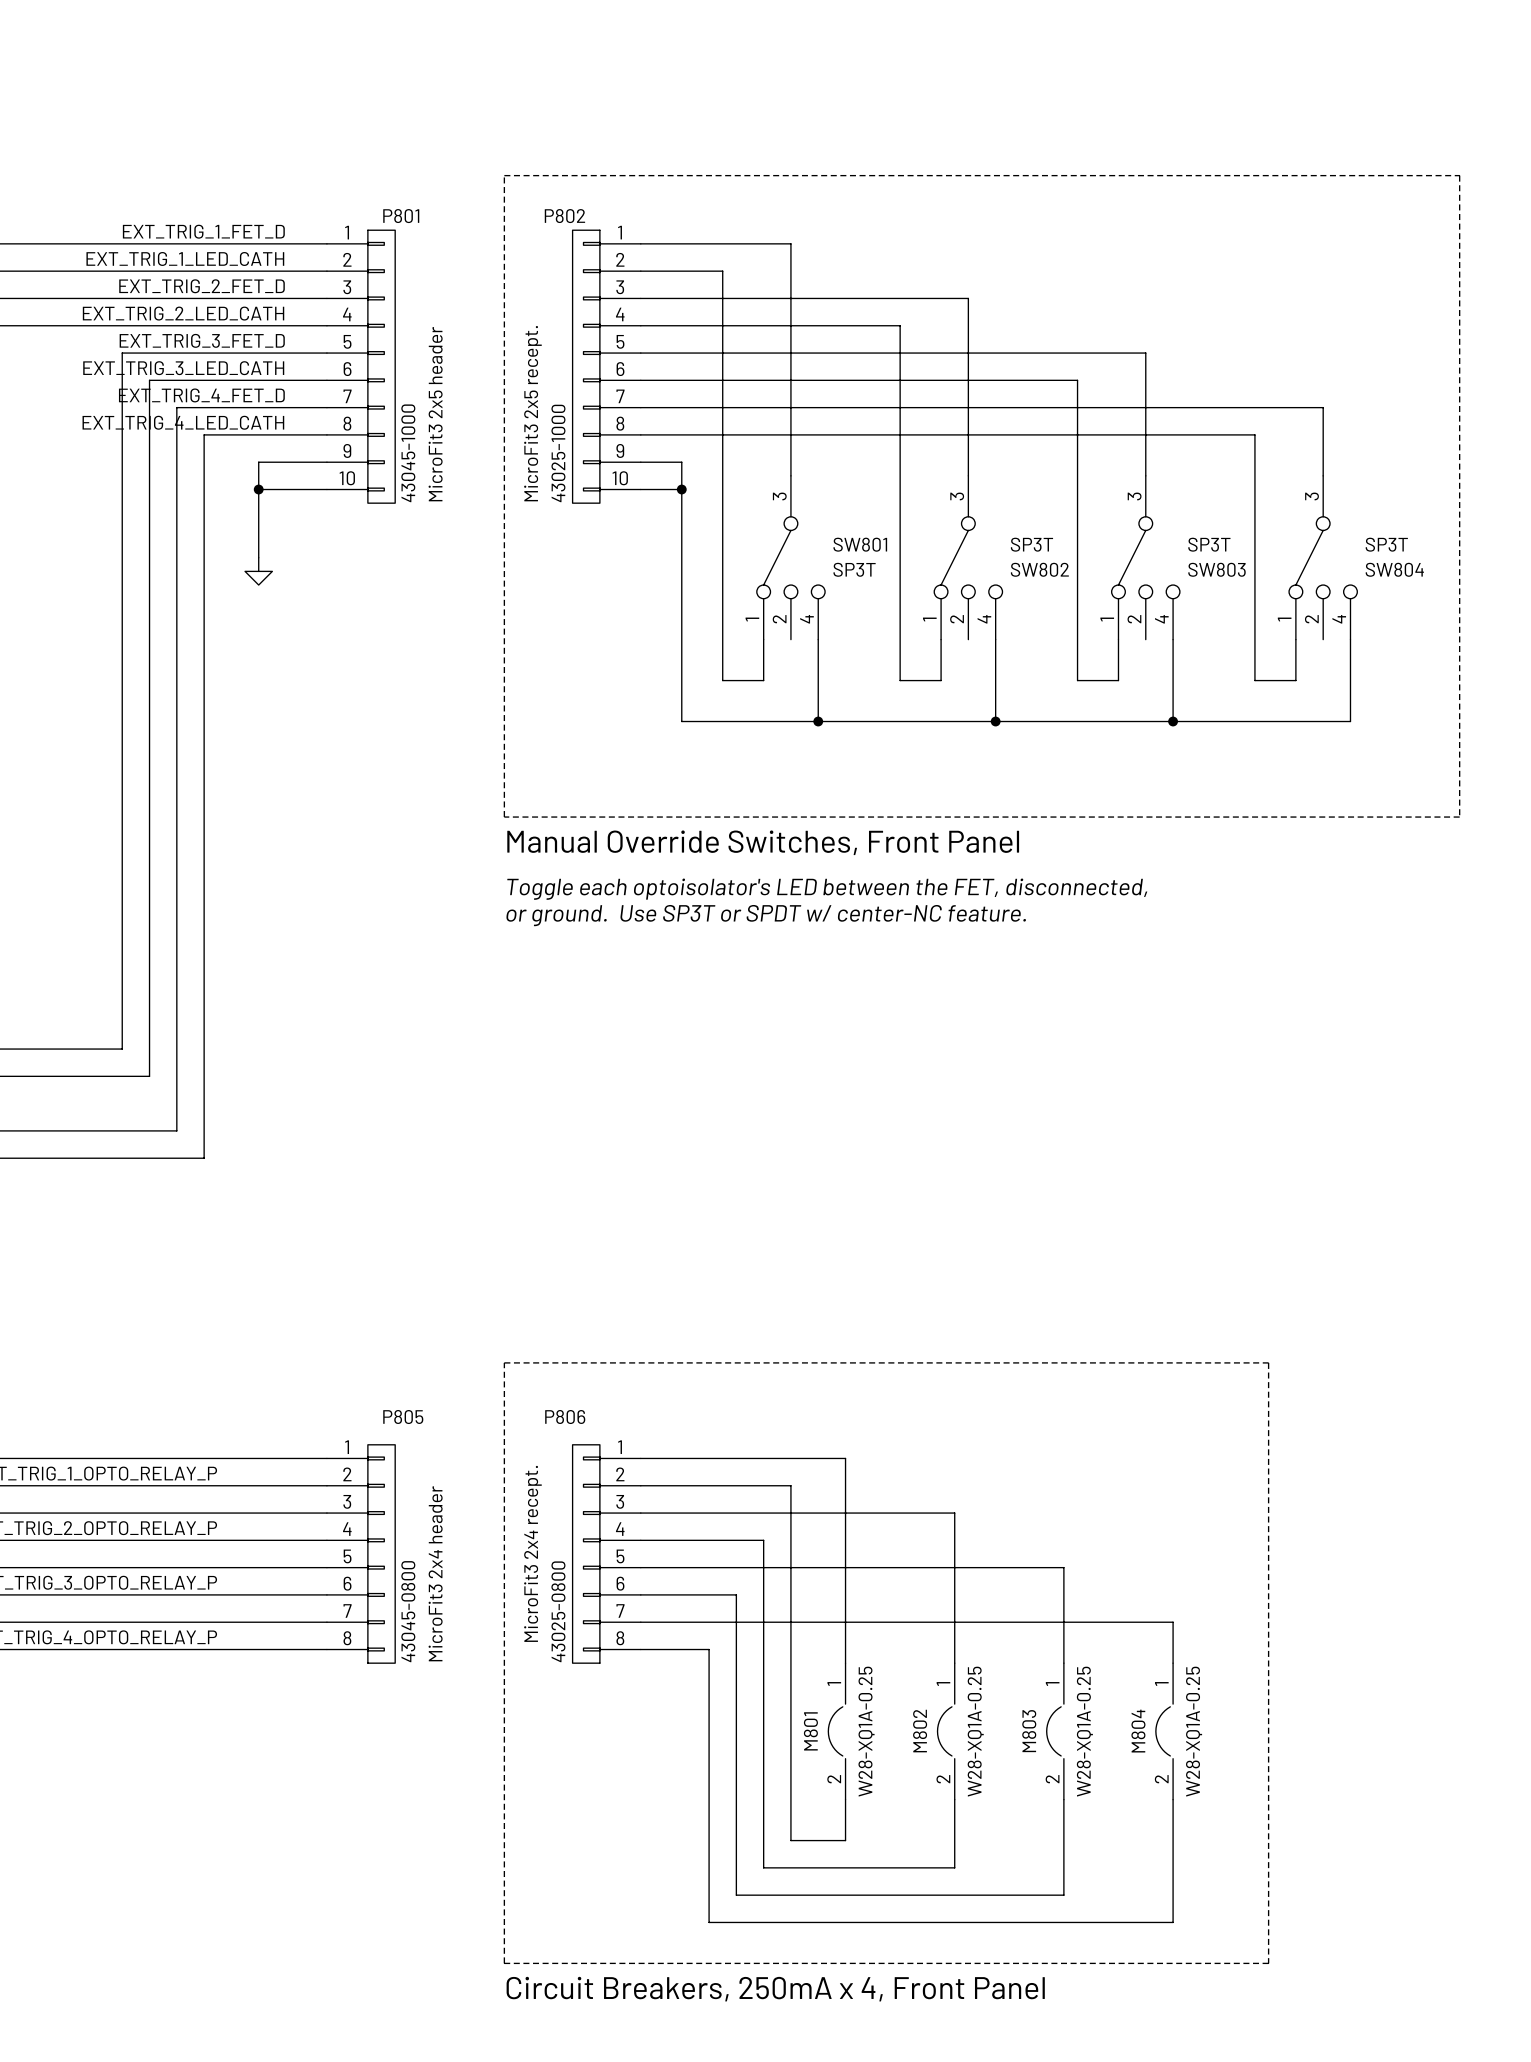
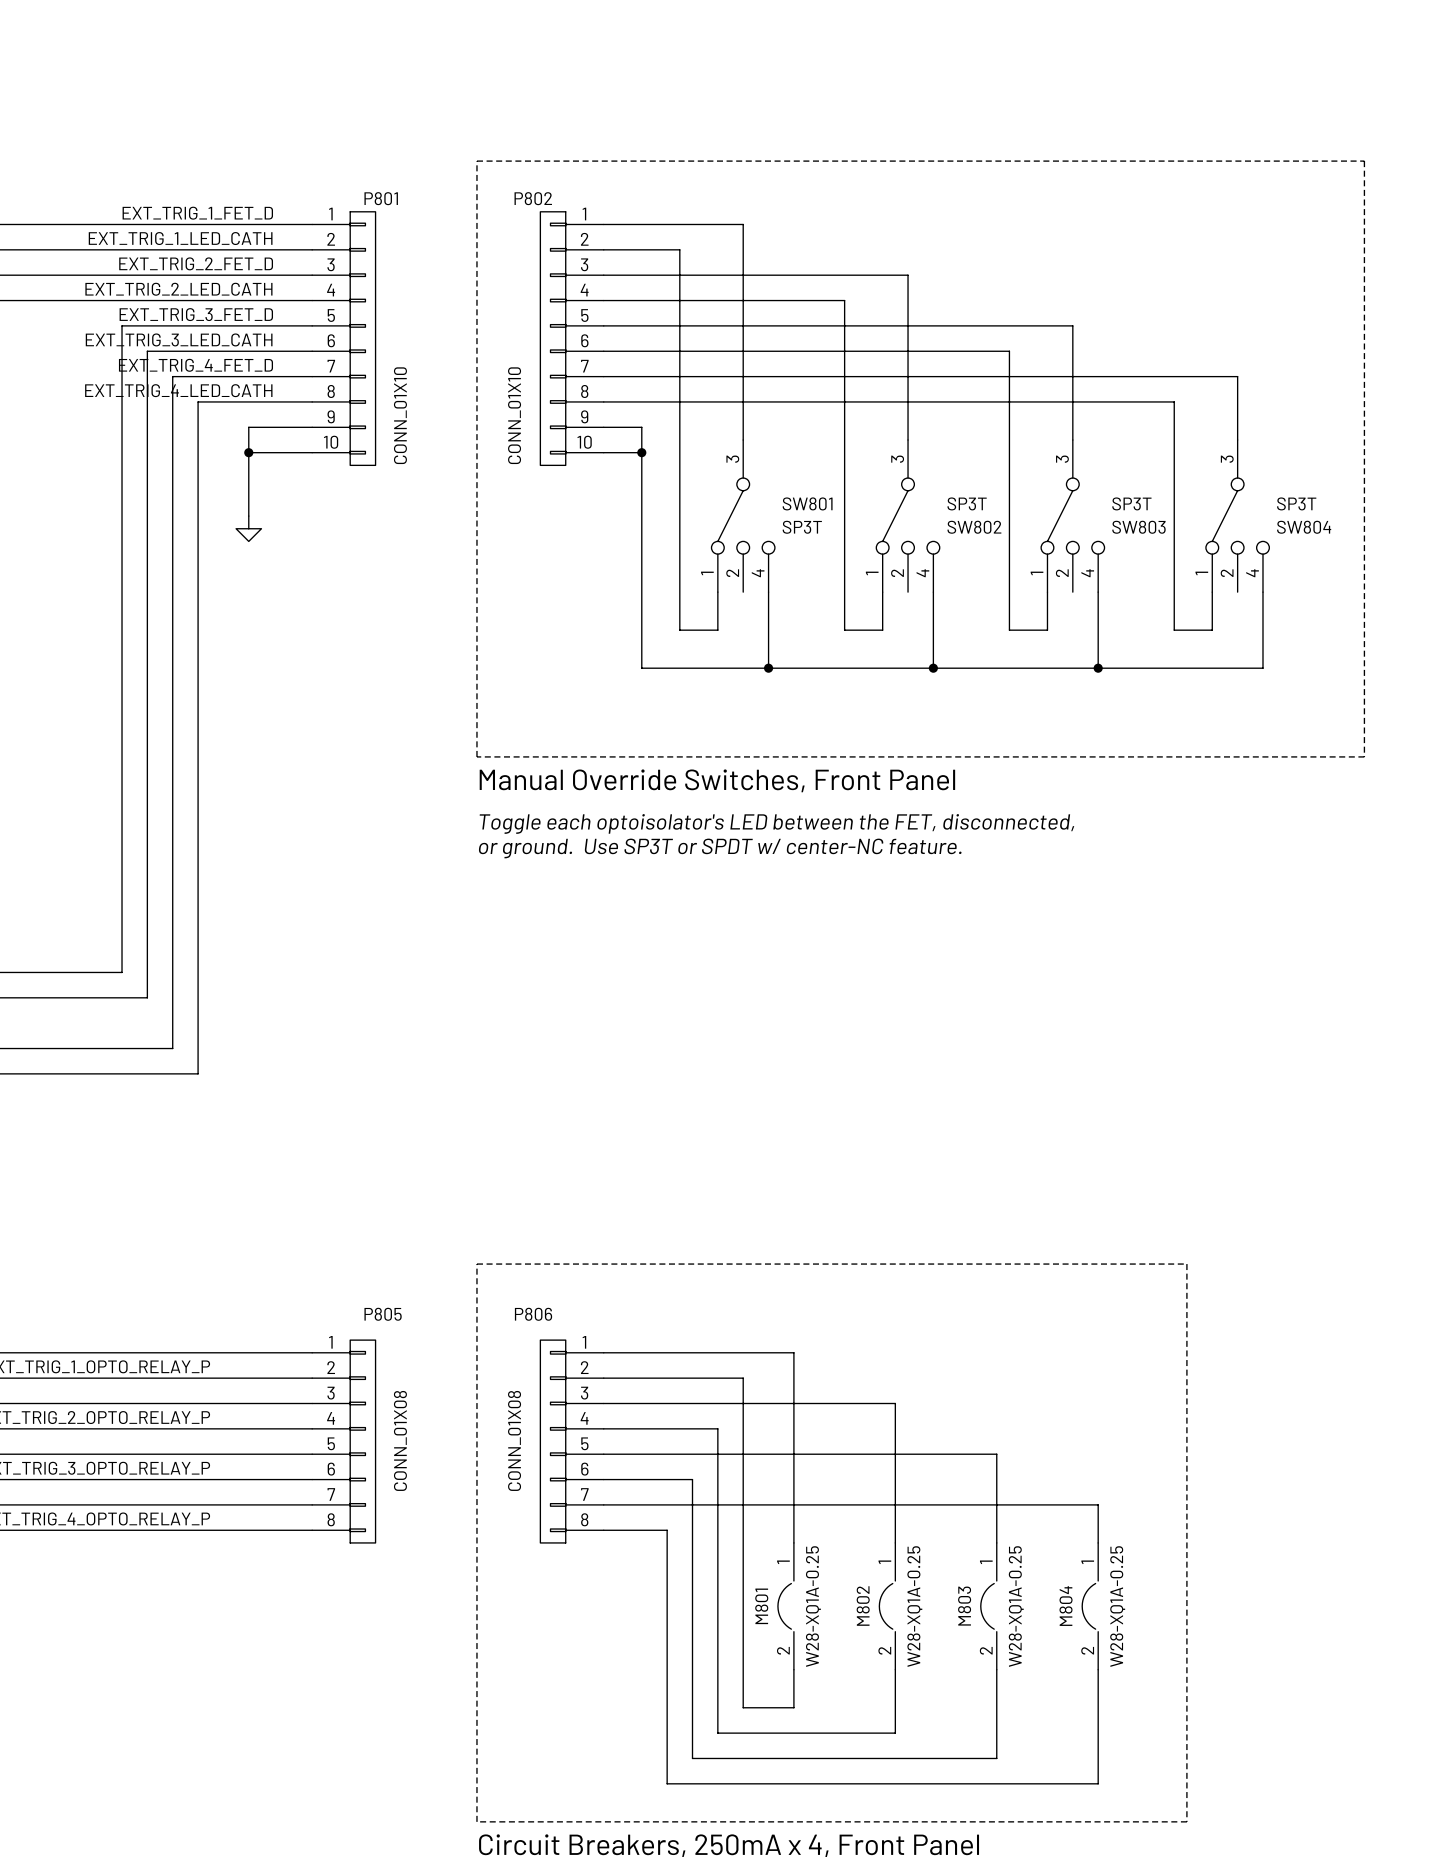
P802 text: MicroFit3 2x5 recept. (532, 413) -> none
P801 text: MicroFit3 2x5 header (435, 414) -> none
P801 value: 43045-1000 (408, 453) -> CONN_01X10 (400, 415)
P802 value: 43025-1000 (558, 453) -> CONN_01X10 (514, 415)
P806 text: MicroFit3 2x4 recept. (532, 1553) -> none
P805 text: MicroFit3 2x4 header (435, 1573) -> none
P805 value: 43045-0800 (408, 1611) -> CONN_01X08 (400, 1440)
P806 value: 43025-0800 (558, 1611) -> CONN_01X08 (514, 1440)

